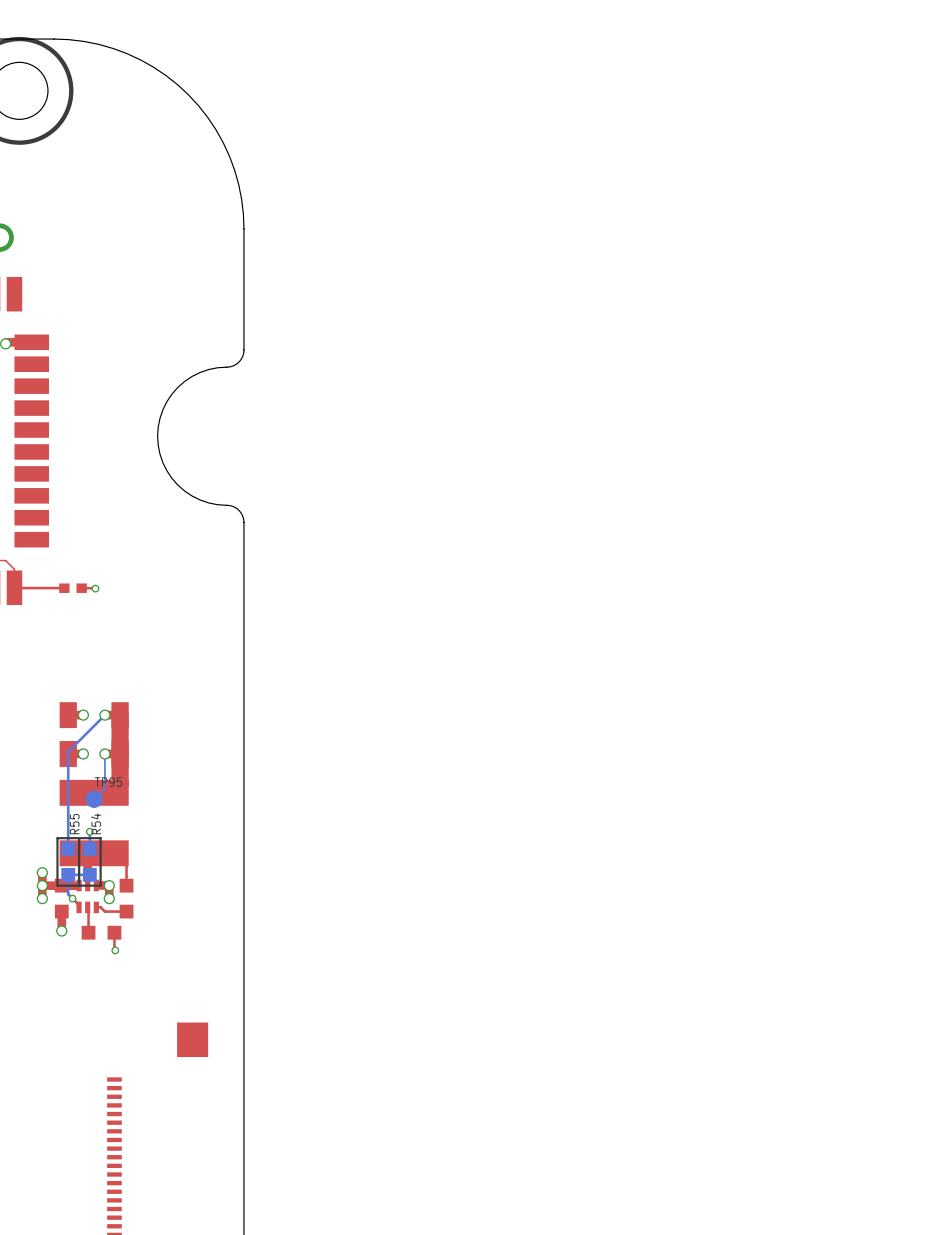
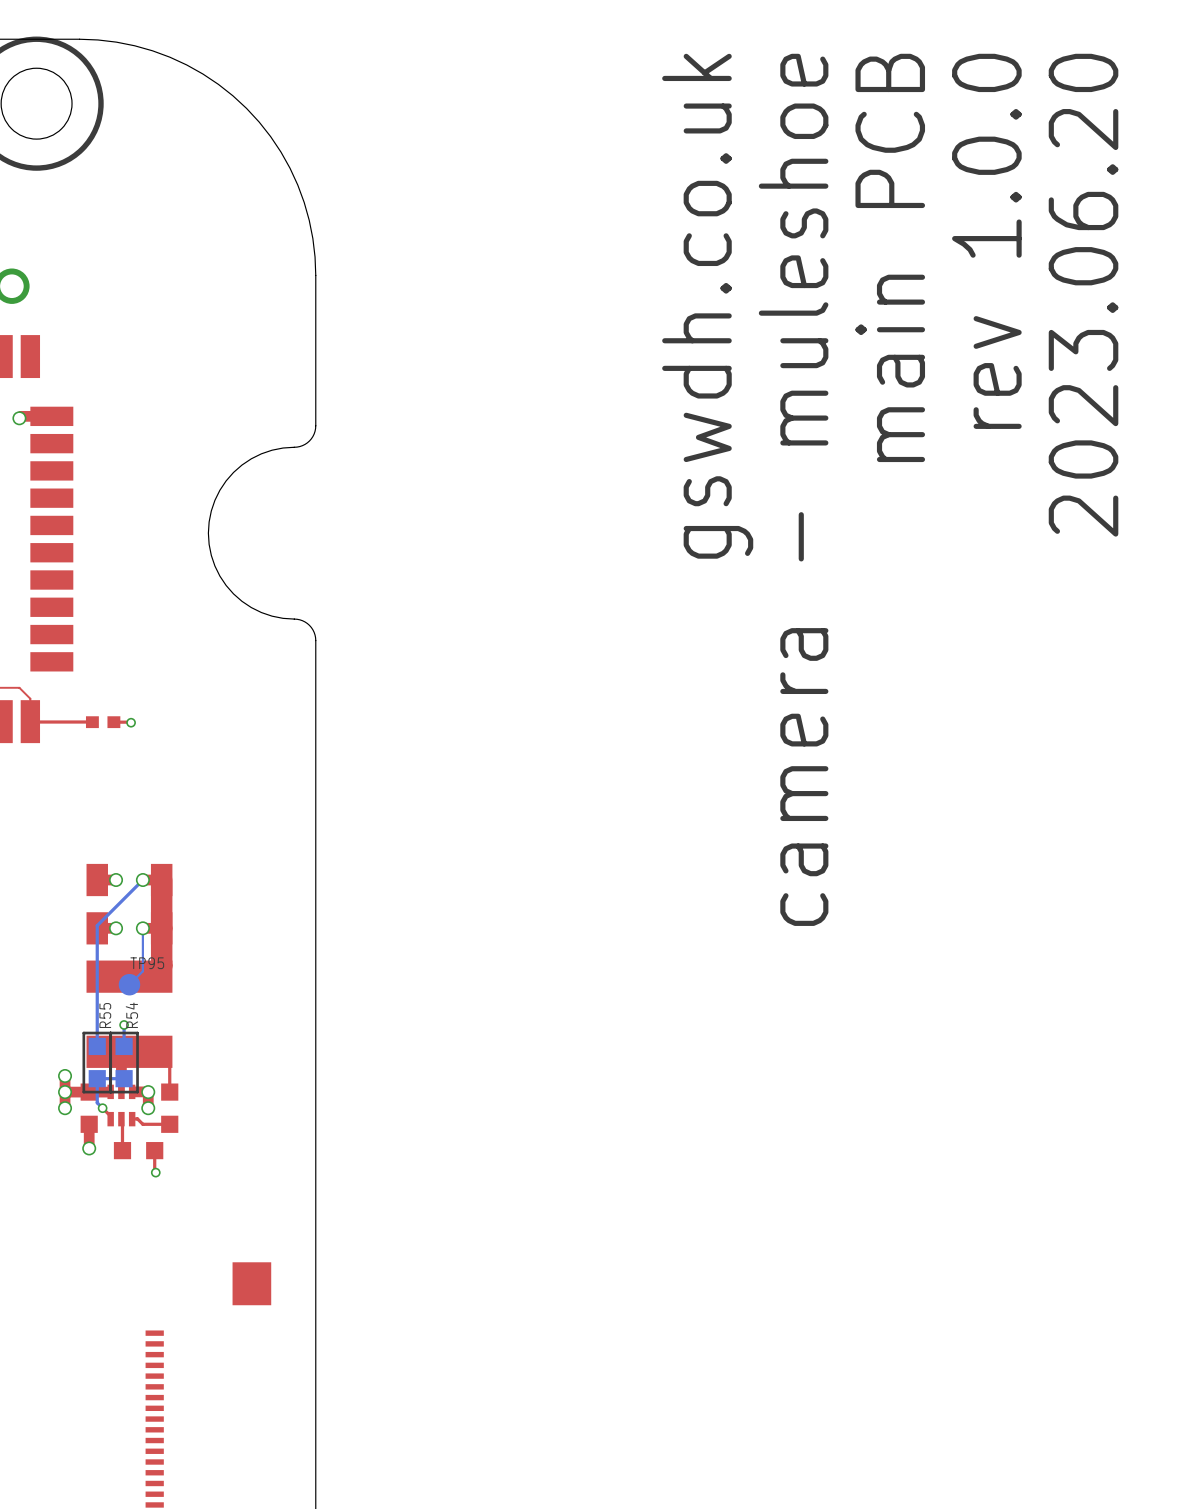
text: none -> rev 1.0.0 (986, 241)
text: none -> main PCB (890, 257)
text: none -> 2023.06.20 (1083, 295)
text: none -> gswdh.co.uk (707, 306)
text: none -> camera - muleshoe (793, 489)

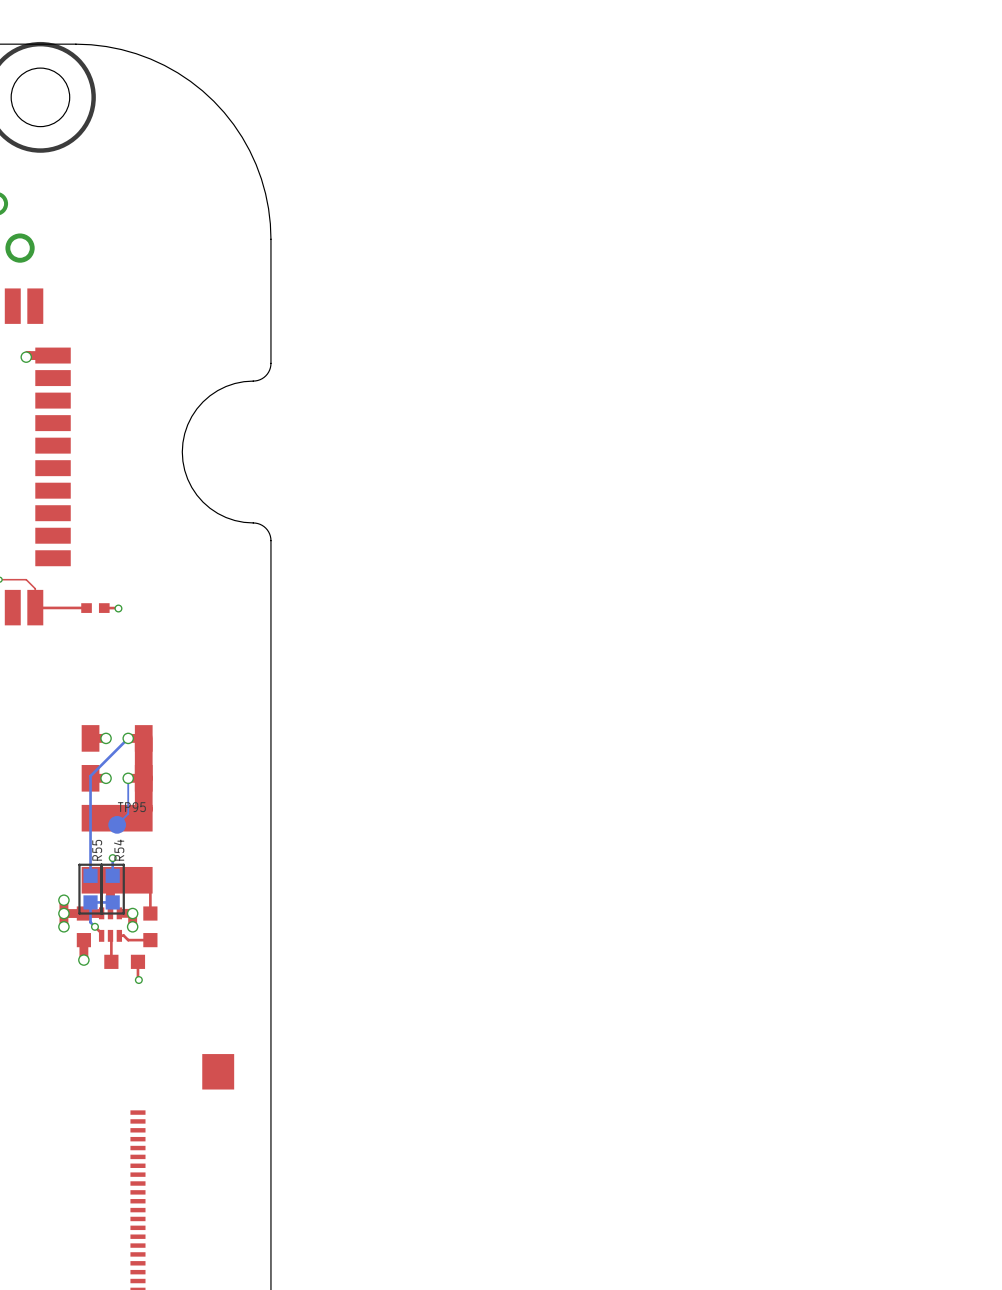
text: rev 1.0.0 (986, 241) -> none
text: main PCB (890, 257) -> none
text: 2023.06.20 (1083, 295) -> none
text: gswdh.co.uk (707, 306) -> none
text: camera - muleshoe (793, 489) -> none

